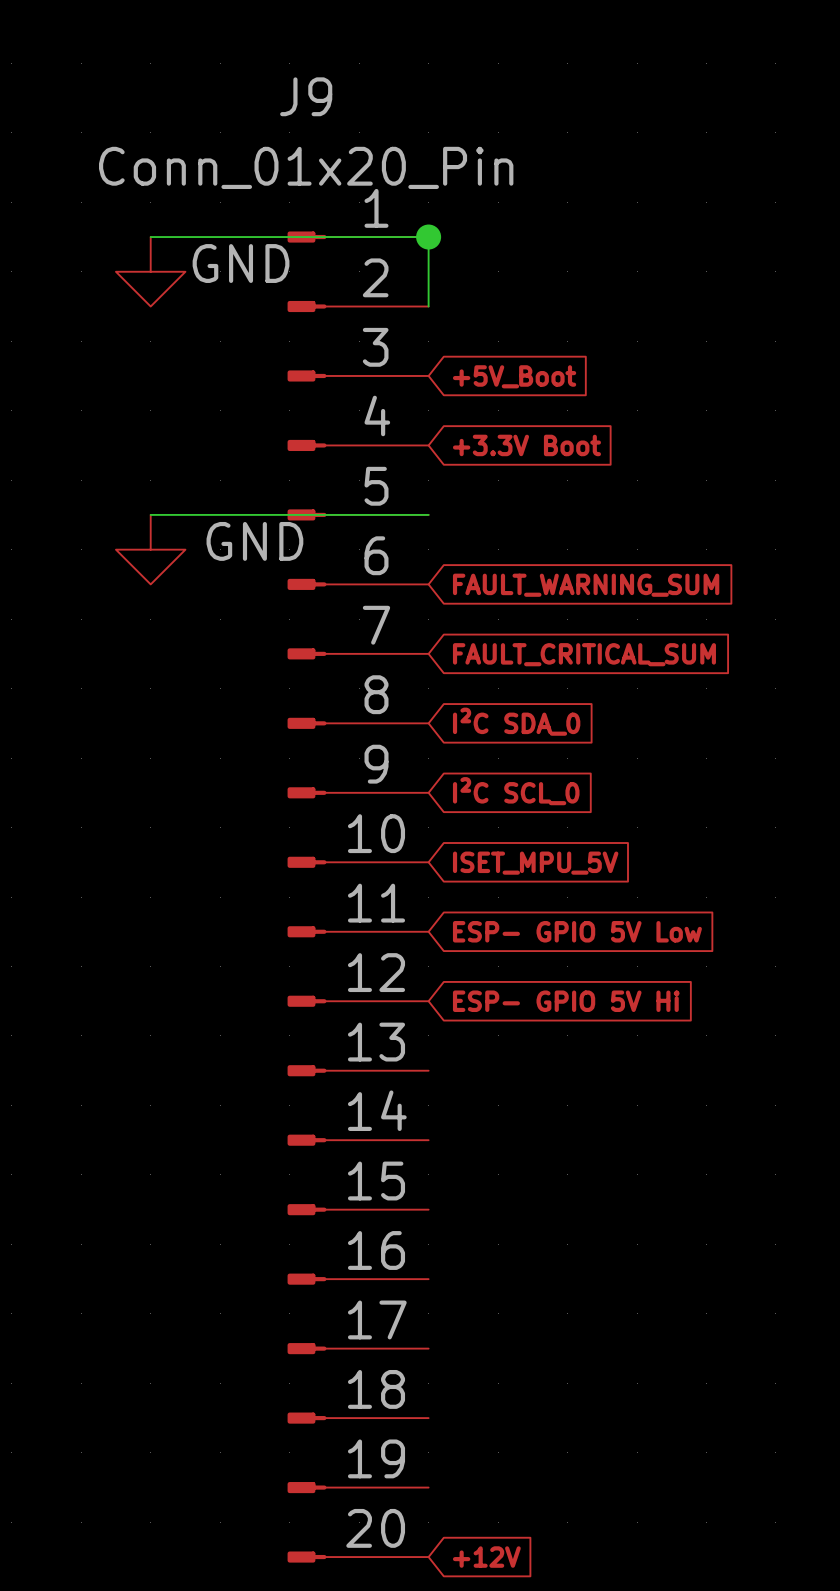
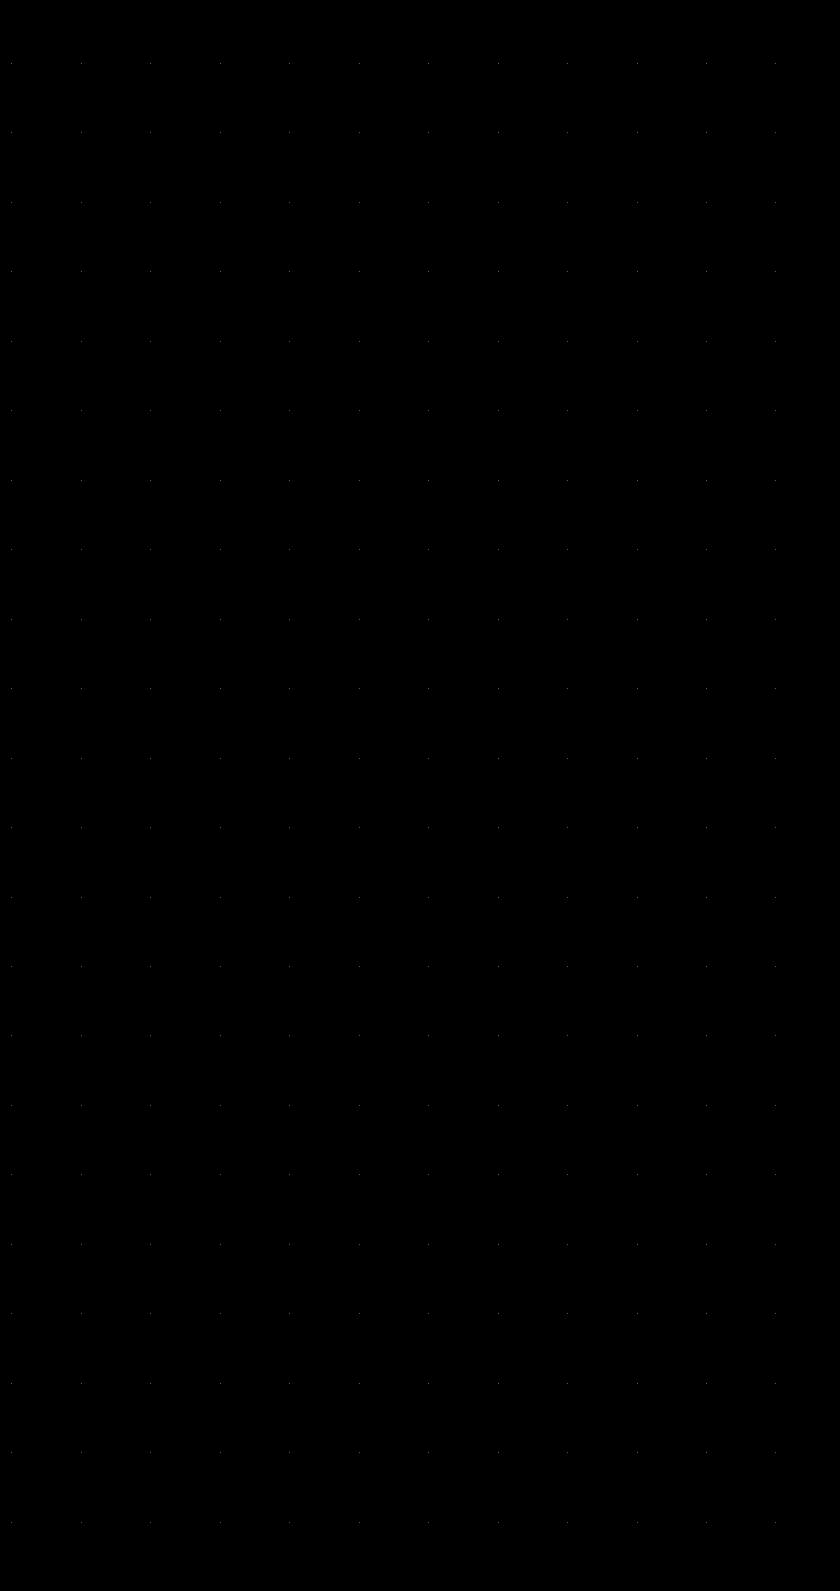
wire: (150, 237) (428, 237) (428, 306) -> none
junction: (428, 237) -> none
power symbol: GND (150, 271) -> none
global label: +5V_Boot (514, 376) -> none
global label: +3.3V Boot (526, 445) -> none
wire: (150, 514) (428, 514) -> none
power symbol: GND (150, 549) -> none
global label: FAULT_WARNING_SUM (586, 585) -> none
global label: FAULT_CRITICAL_SUM (584, 654) -> none
global label: I²C SDA_0 (516, 721) -> none
global label: I²C SCL_0 (516, 791) -> none
global label: ISET_MPU_5V (535, 863) -> none
J9: Conn_01x20_Pin (358, 897) -> none
global label: ESP- GPIO 5V Low (577, 931) -> none
global label: ESP- GPIO 5V Hi (566, 1001) -> none
global label: +12V (486, 1557) -> none

